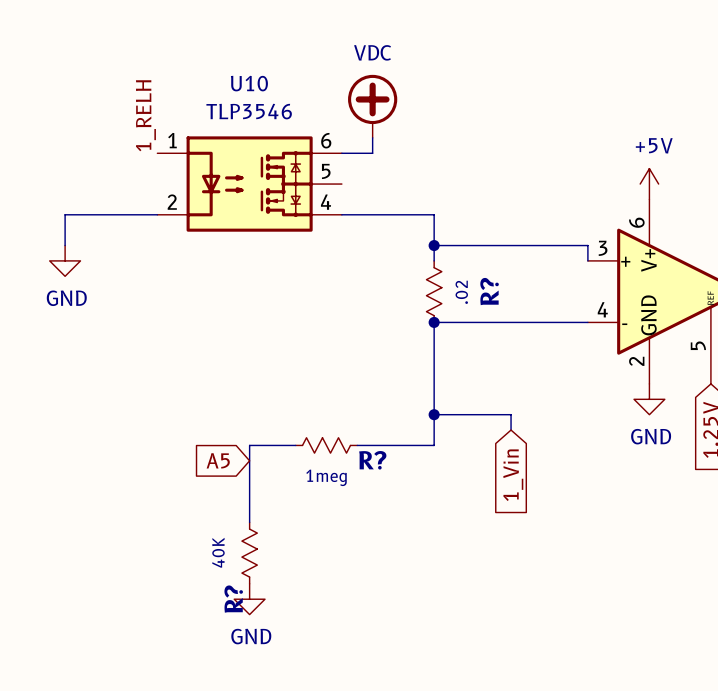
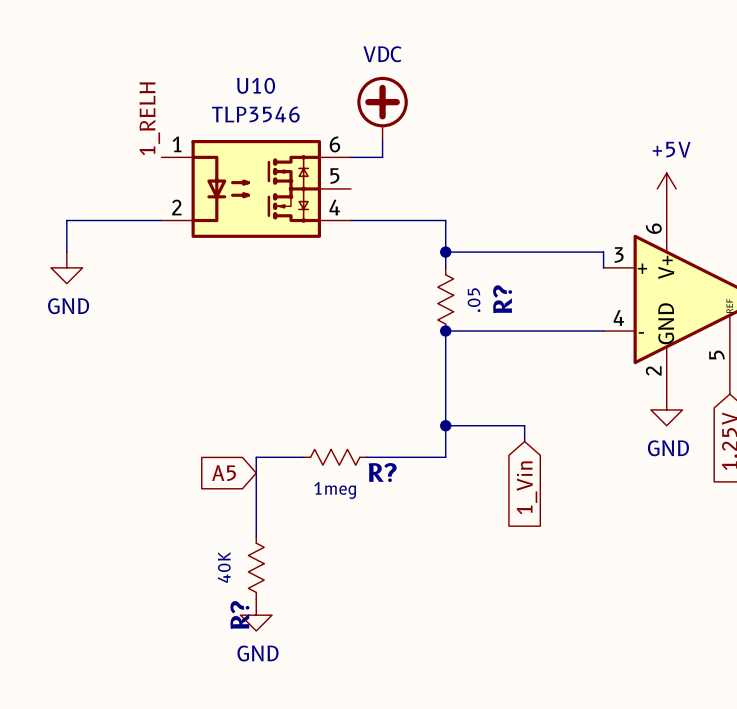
R? value: .02 (461, 292) -> .05 (474, 300)

